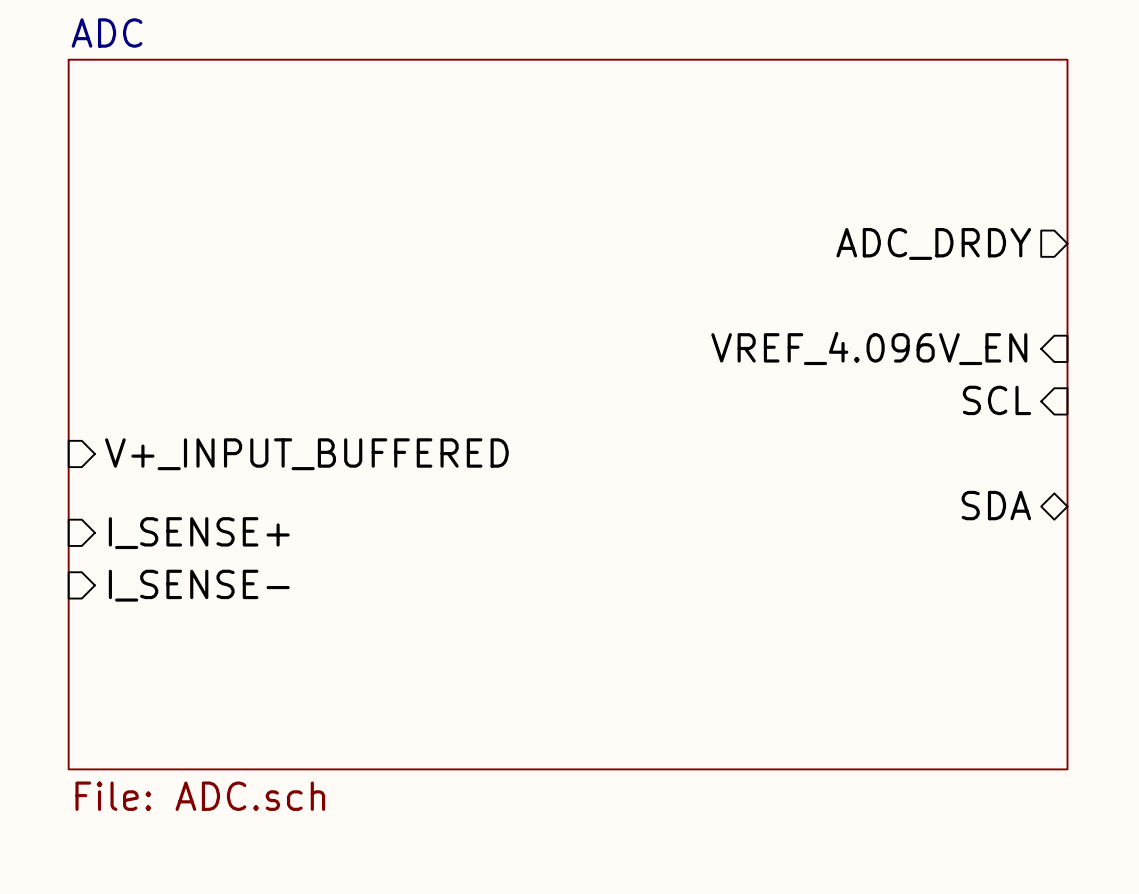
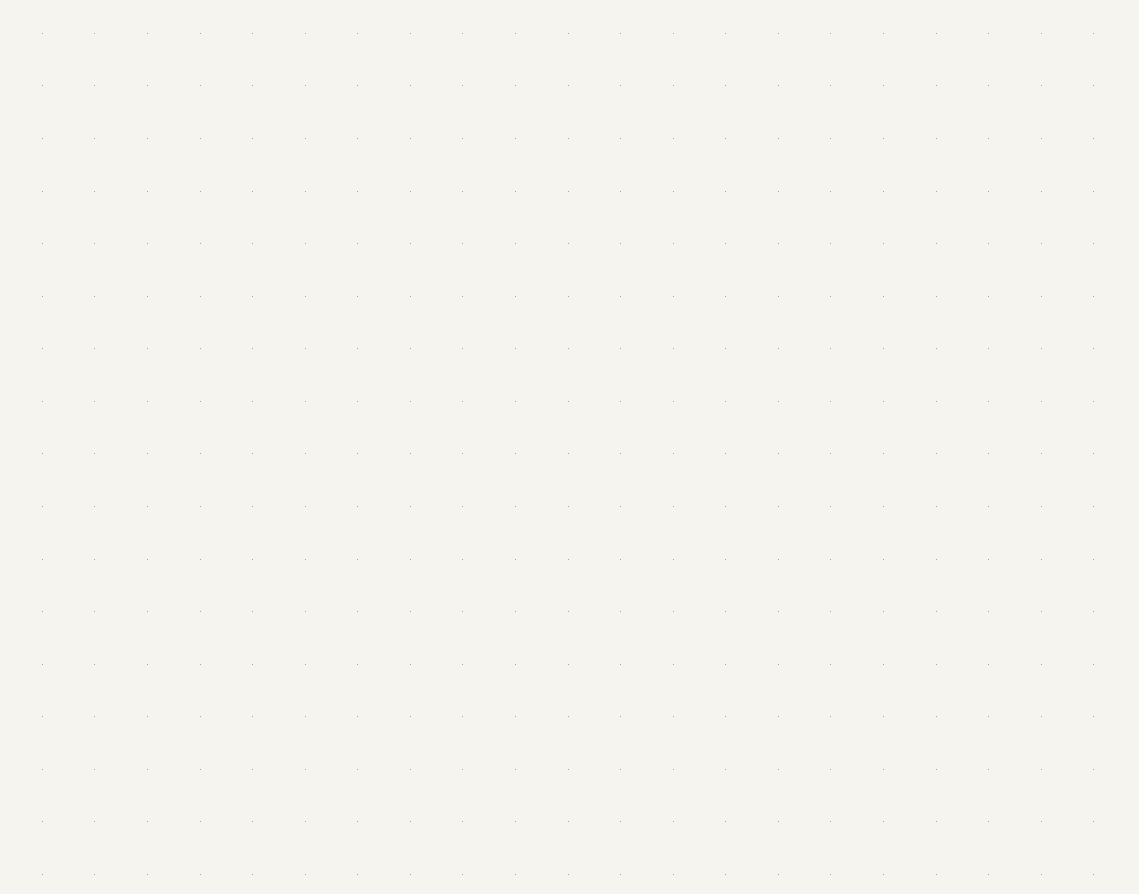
sheet pin: ADC_DRDY (933, 243) -> none
sheet pin: VREF_4.096V_EN (869, 348) -> none
sheet pin: SCL (996, 400) -> none
sheet ADC: File: ADC.sch (568, 414) -> none
sheet pin: V+_INPUT_BUFFERED (306, 454) -> none
sheet pin: SDA (996, 505) -> none
sheet pin: I_SENSE+ (199, 533) -> none
sheet pin: I_SENSE- (199, 585) -> none

